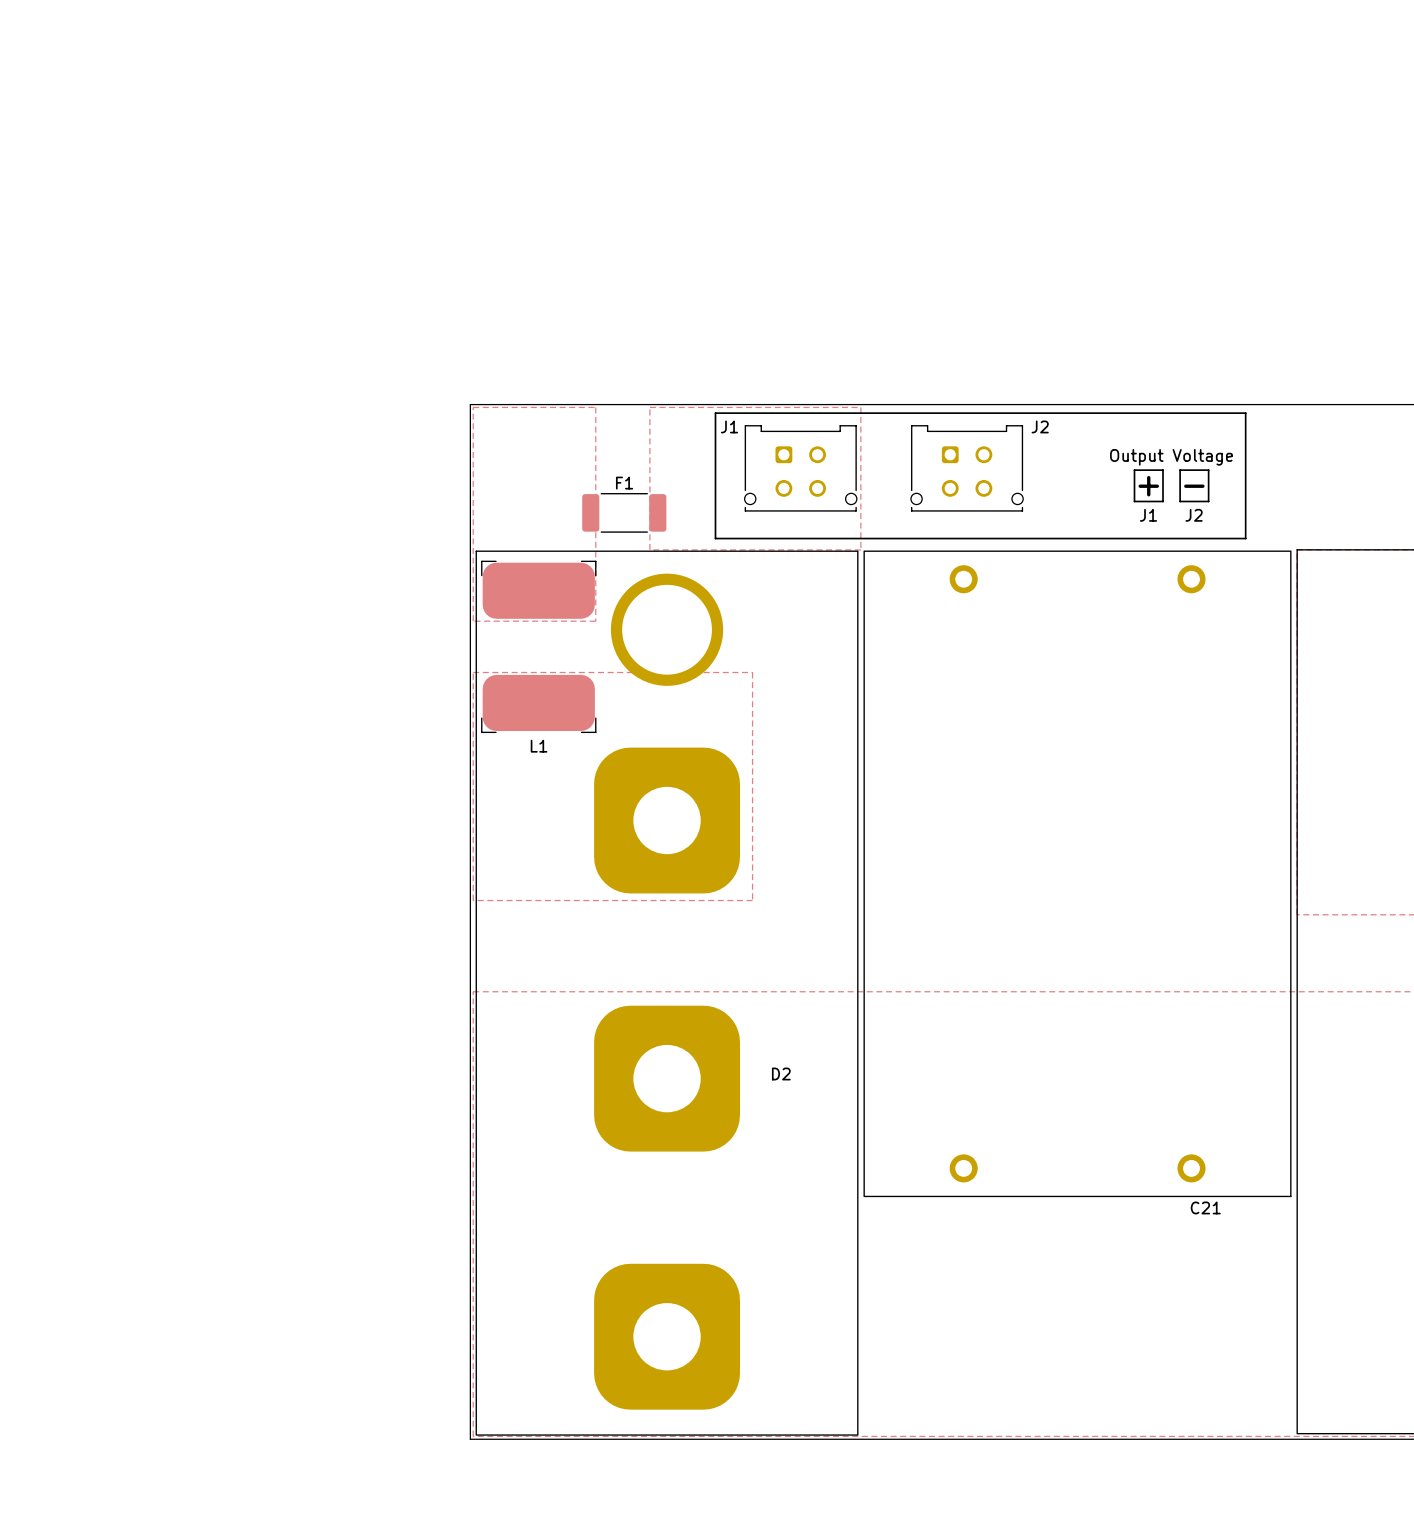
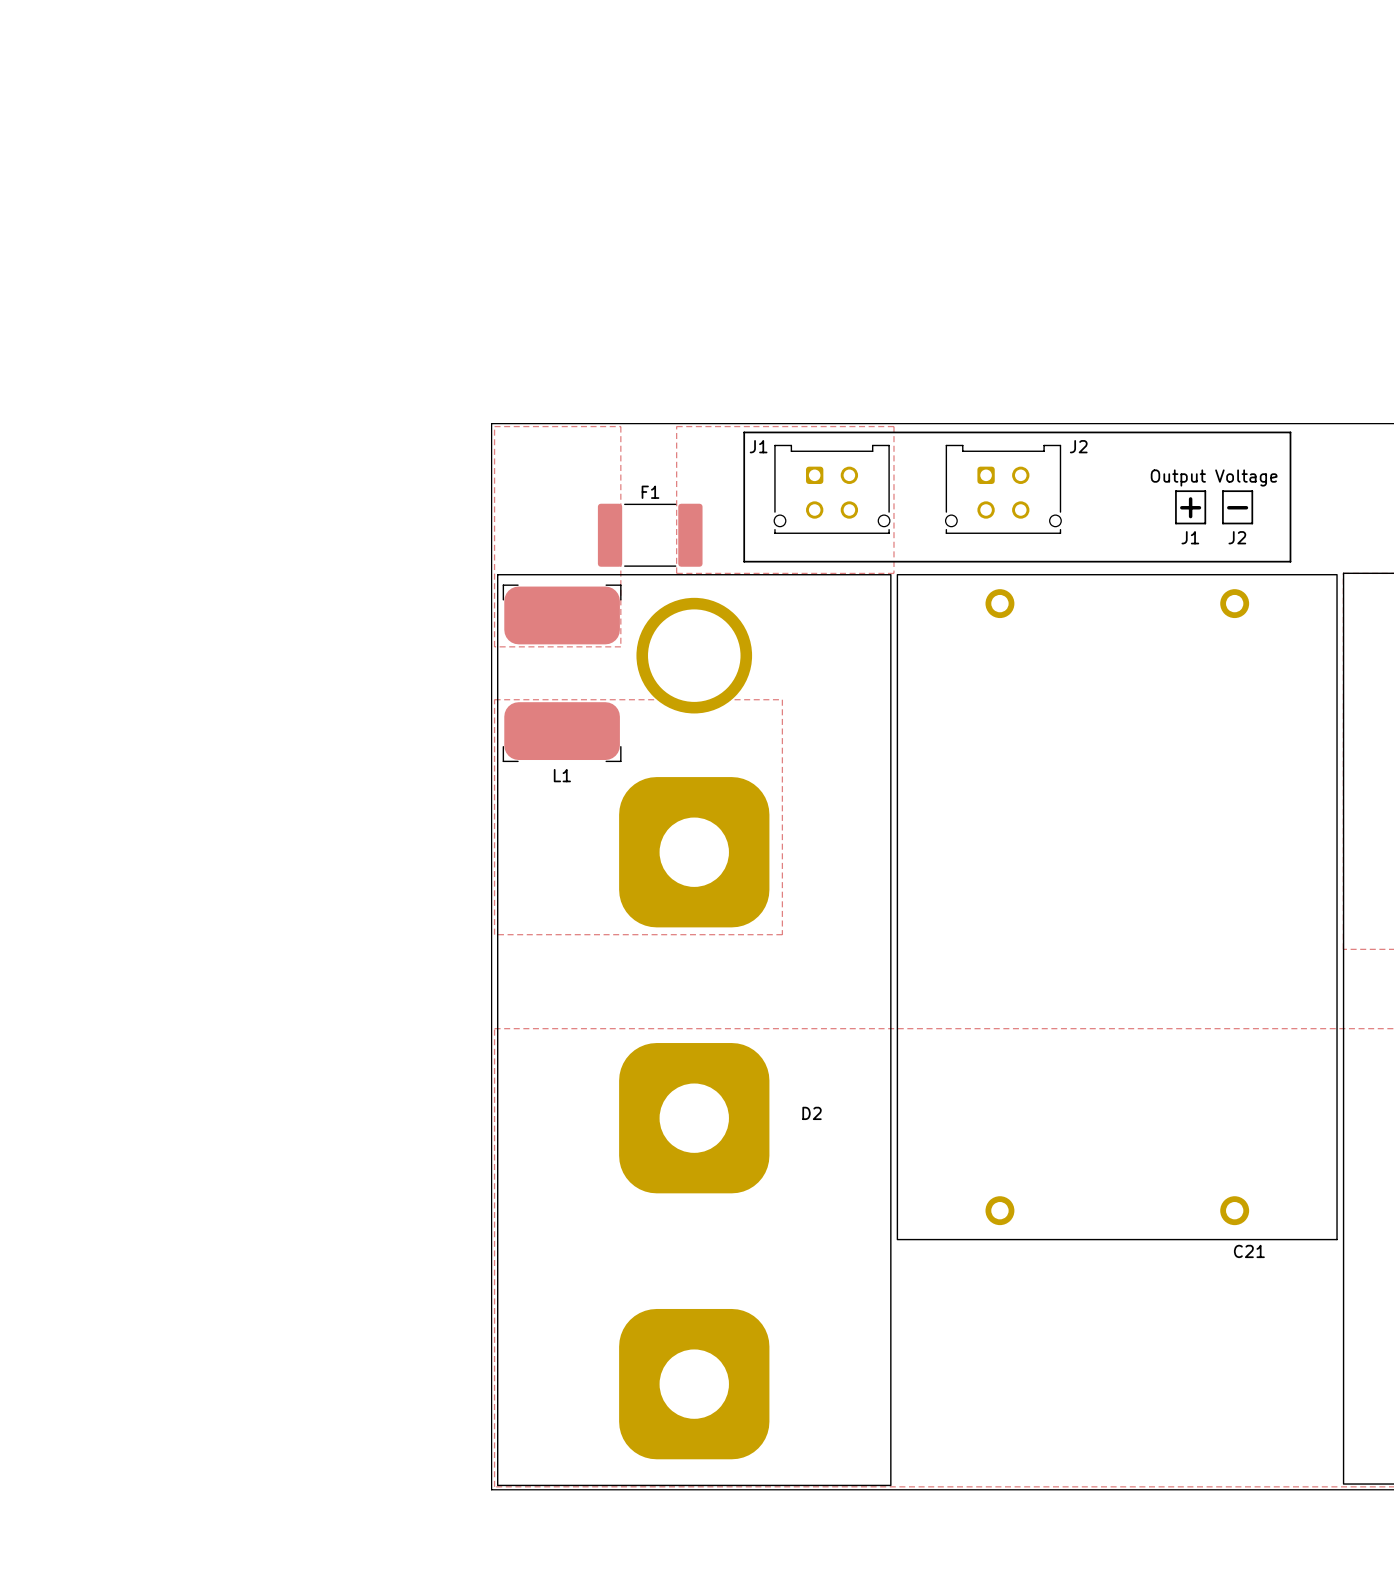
F1 footprint: [582, 493, 667, 533] -> [597, 503, 703, 567]

